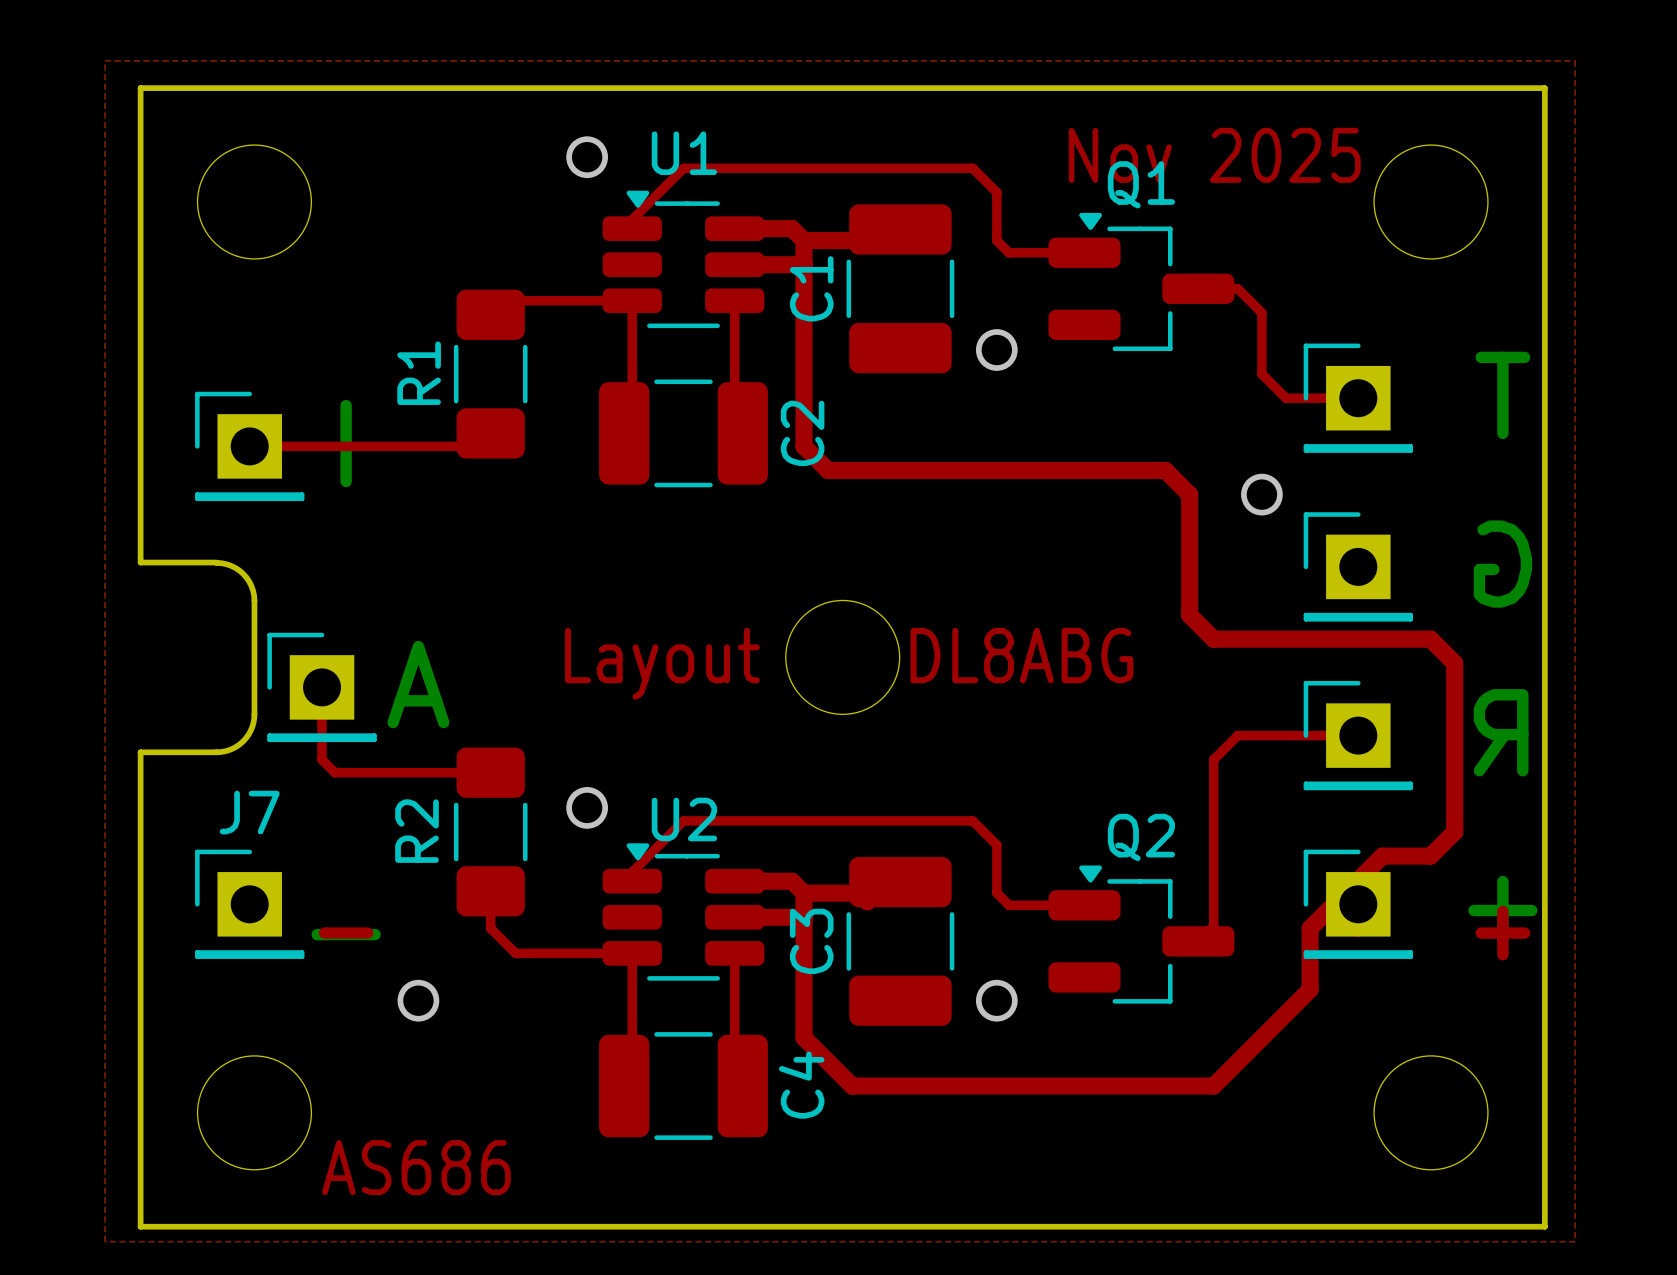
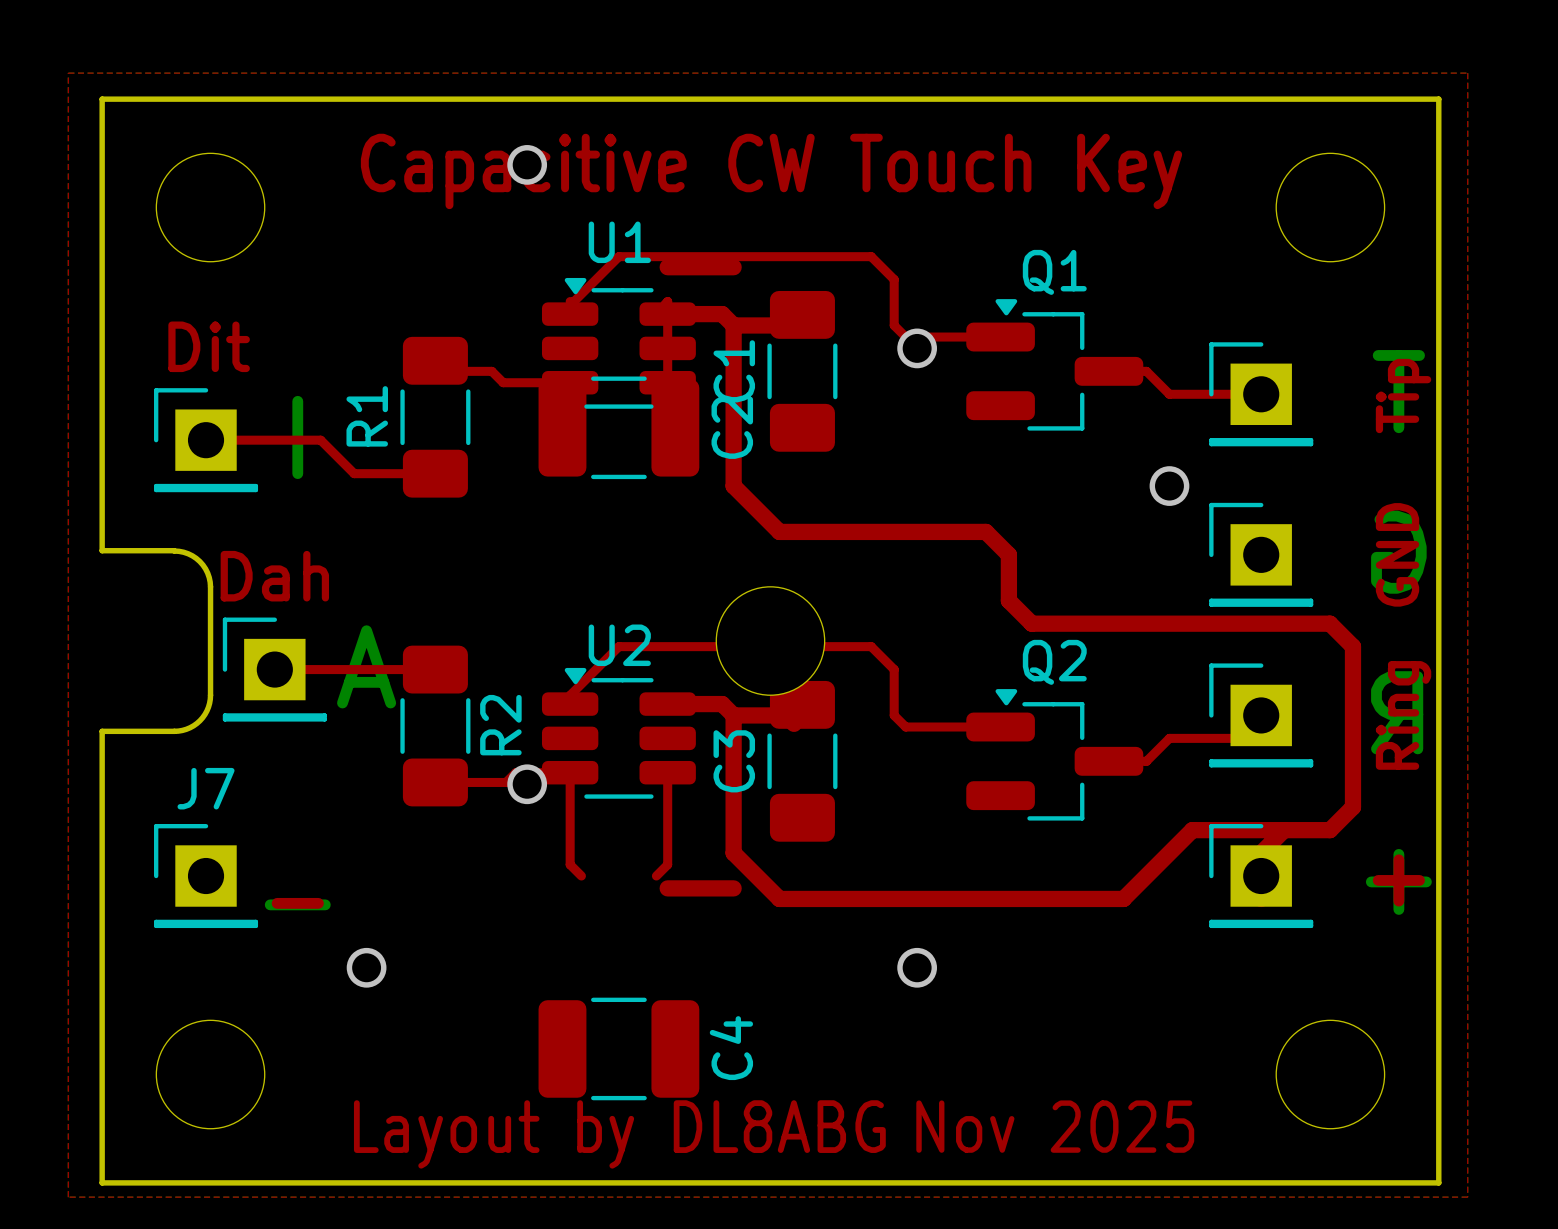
text: Nov 2025 (1214, 155) -> none
text: none -> Capacitive CW Touch Key (771, 171)
C1 footprint: [846, 204, 955, 374] -> [767, 290, 838, 452]
top track: (632, 228) (632, 219) (683, 168) (972, 168) (996, 192) (996, 240) (1008, 252) (1105, 252) -> none
top track: (734, 228) (792, 228) (804, 240) -> none
top track: (804, 240) (804, 325) -> none
top track: (804, 240) (867, 240) -> none
U1 position: (683, 259) -> (618, 343)
Q1 position: (1141, 281) -> (1054, 364)
top track: (1177, 288) (1237, 288) (1261, 312) (1261, 374) (1286, 398) -> (1088, 371) (1146, 371) (1169, 394) (1192, 394)
top track: (632, 304) (632, 300) (504, 300) (490, 314) -> (570, 305) (618, 256) (871, 256) (894, 279) (894, 325) (905, 337) (1020, 337)
top track: (632, 313) (632, 386) -> none
top track: none -> (667, 314) (722, 314) (733, 325) (794, 325)
text: none -> Dit (209, 346)
top track: none -> (435, 360) (435, 371) (491, 371) (503, 382) (570, 382) (573, 385)
R1 position: (490, 374) -> (435, 417)
text: none -> Tip (1403, 396)
top track: (490, 433) (479, 433) (466, 446) (370, 446) -> (435, 473) (354, 473) (320, 440)
top track: (804, 446) (828, 470) (1165, 470) (1189, 494) (1189, 615) (1213, 639) -> (733, 440) (733, 486) (779, 531) (985, 531) (1008, 554) (1008, 600) (1031, 623) (1123, 623)
text: none -> GND (1397, 554)
text: none -> Dah (274, 576)
text: DL8ABG (1021, 655) -> none
text: Layout (662, 663) -> none
top track: (322, 687) (322, 759) (335, 772) (490, 772) -> (274, 669) (412, 669)
top track: none -> (570, 704) (570, 695) (618, 646) (871, 646) (894, 669) (894, 715) (905, 727) (1020, 727)
top track: none -> (733, 715) (733, 853) (779, 898) (1123, 898) (1192, 830) (1284, 830)
top track: (1358, 735) (1237, 735) (1213, 759) (1213, 926) (1198, 941) -> none
text: none -> Ring (1403, 715)
top track: none -> (1261, 738) (1169, 738) (1146, 761) (1088, 761)
R2 name position: R2 (417, 831) -> R2 (500, 725)
R2 position: (490, 832) -> (435, 726)
C3 footprint: [846, 856, 955, 1026] -> [767, 680, 838, 842]
top track: (632, 872) (683, 820) (972, 820) (996, 845) (996, 893) (1009, 905) (1105, 905) -> (570, 845) (570, 772) (515, 772) (506, 782) (412, 782)
top track: none -> (570, 854) (570, 864) (581, 876)
top track: (734, 881) (792, 881) (804, 893) -> (667, 704) (722, 704) (733, 715)
top track: (490, 891) (490, 928) (515, 953) (632, 953) (632, 1050) (644, 1061) -> none
top track: (804, 893) (858, 893) (867, 902) -> (733, 715) (785, 715) (794, 723)
top track: (804, 893) (804, 1037) (852, 1086) (1213, 1086) (1310, 989) (1310, 928) (1334, 904) (1358, 904) -> none
U2 position: (683, 911) -> (618, 733)
text position: + (1502, 933) -> + (1398, 880)
Q2 position: (1141, 934) -> (1054, 754)
top track: (734, 953) (734, 1050) (722, 1061) -> (667, 772) (667, 864) (656, 876)
text: AS686 (416, 1167) -> none
text: none -> Nov 2025 (1055, 1126)
text: none -> Layout by DL8ABG (619, 1134)

